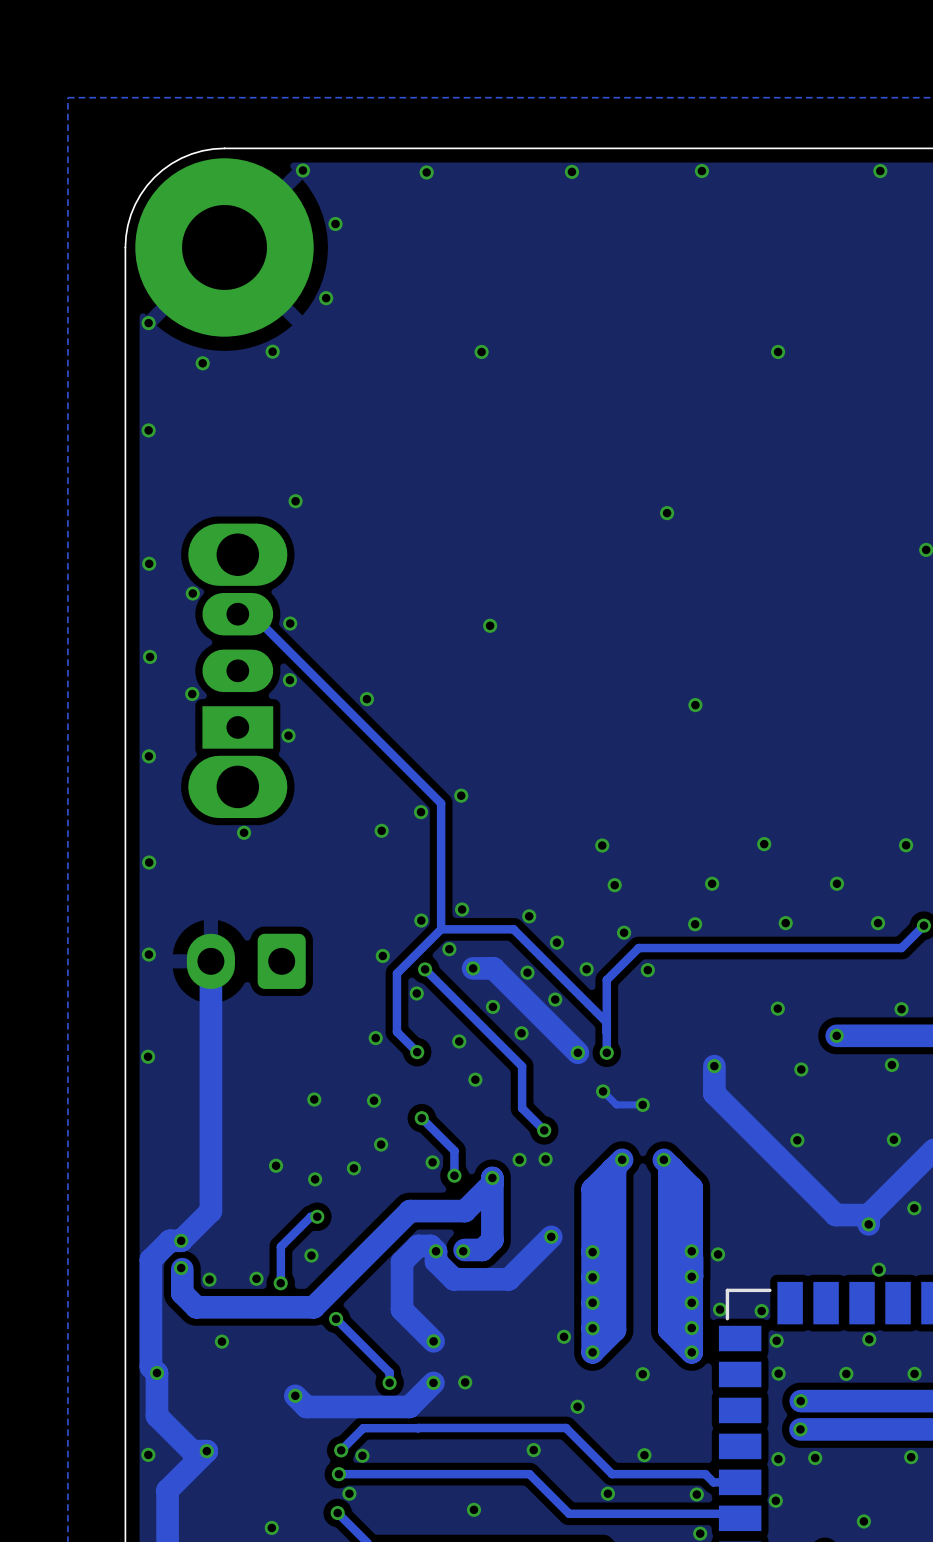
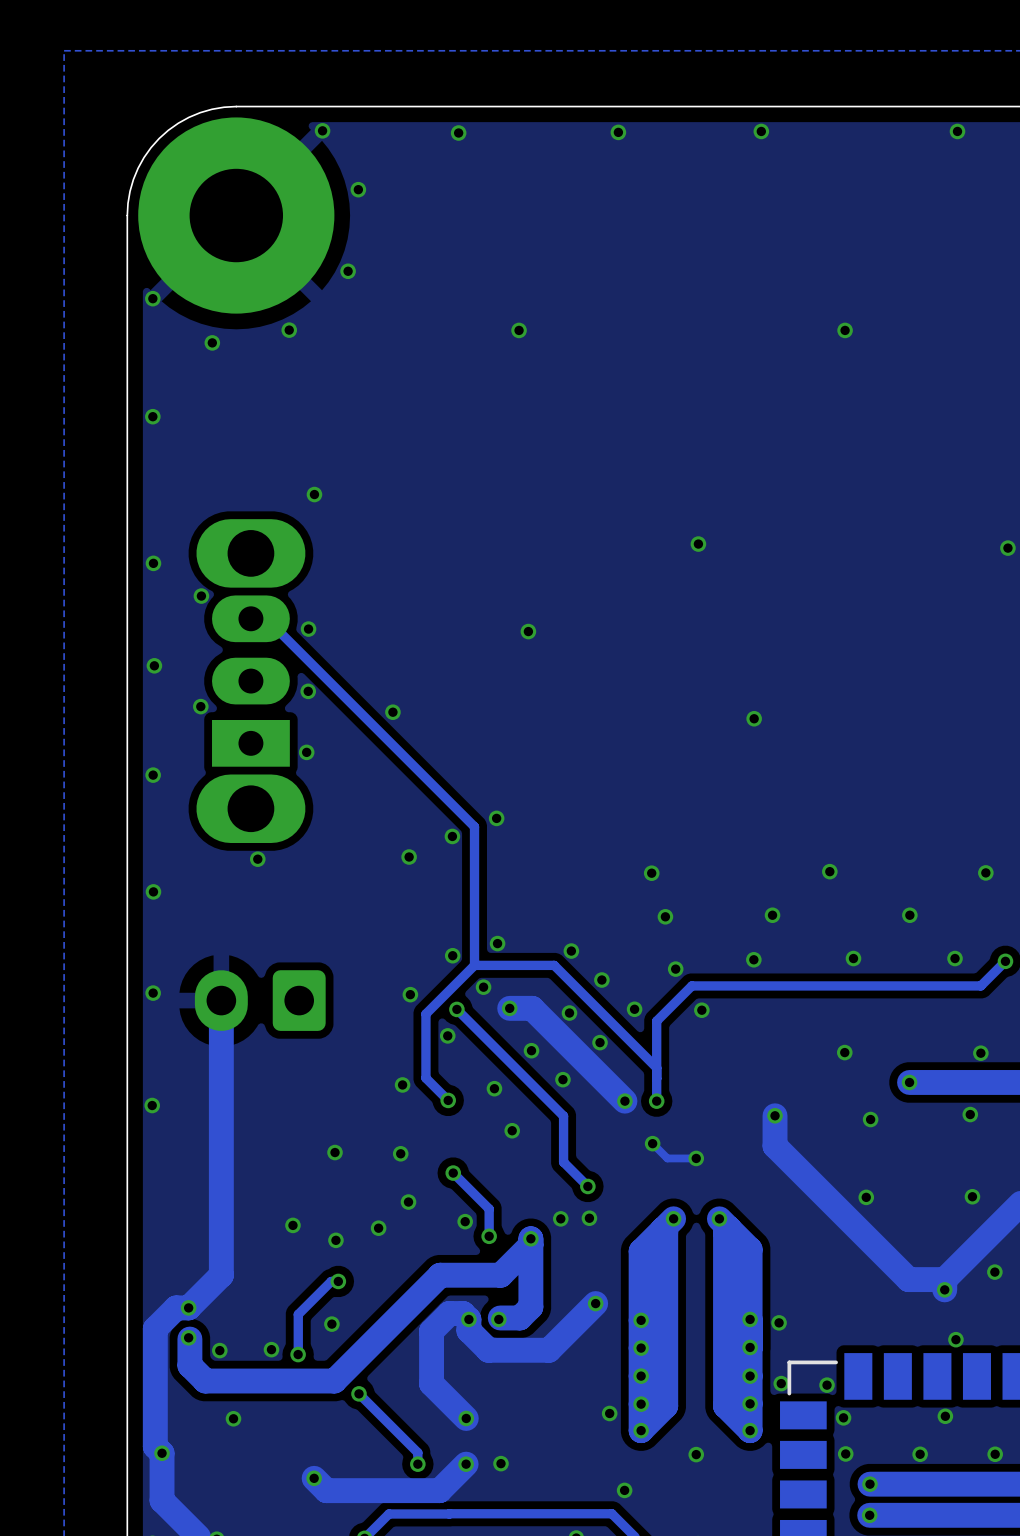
via position: (667, 513) -> (698, 544)

